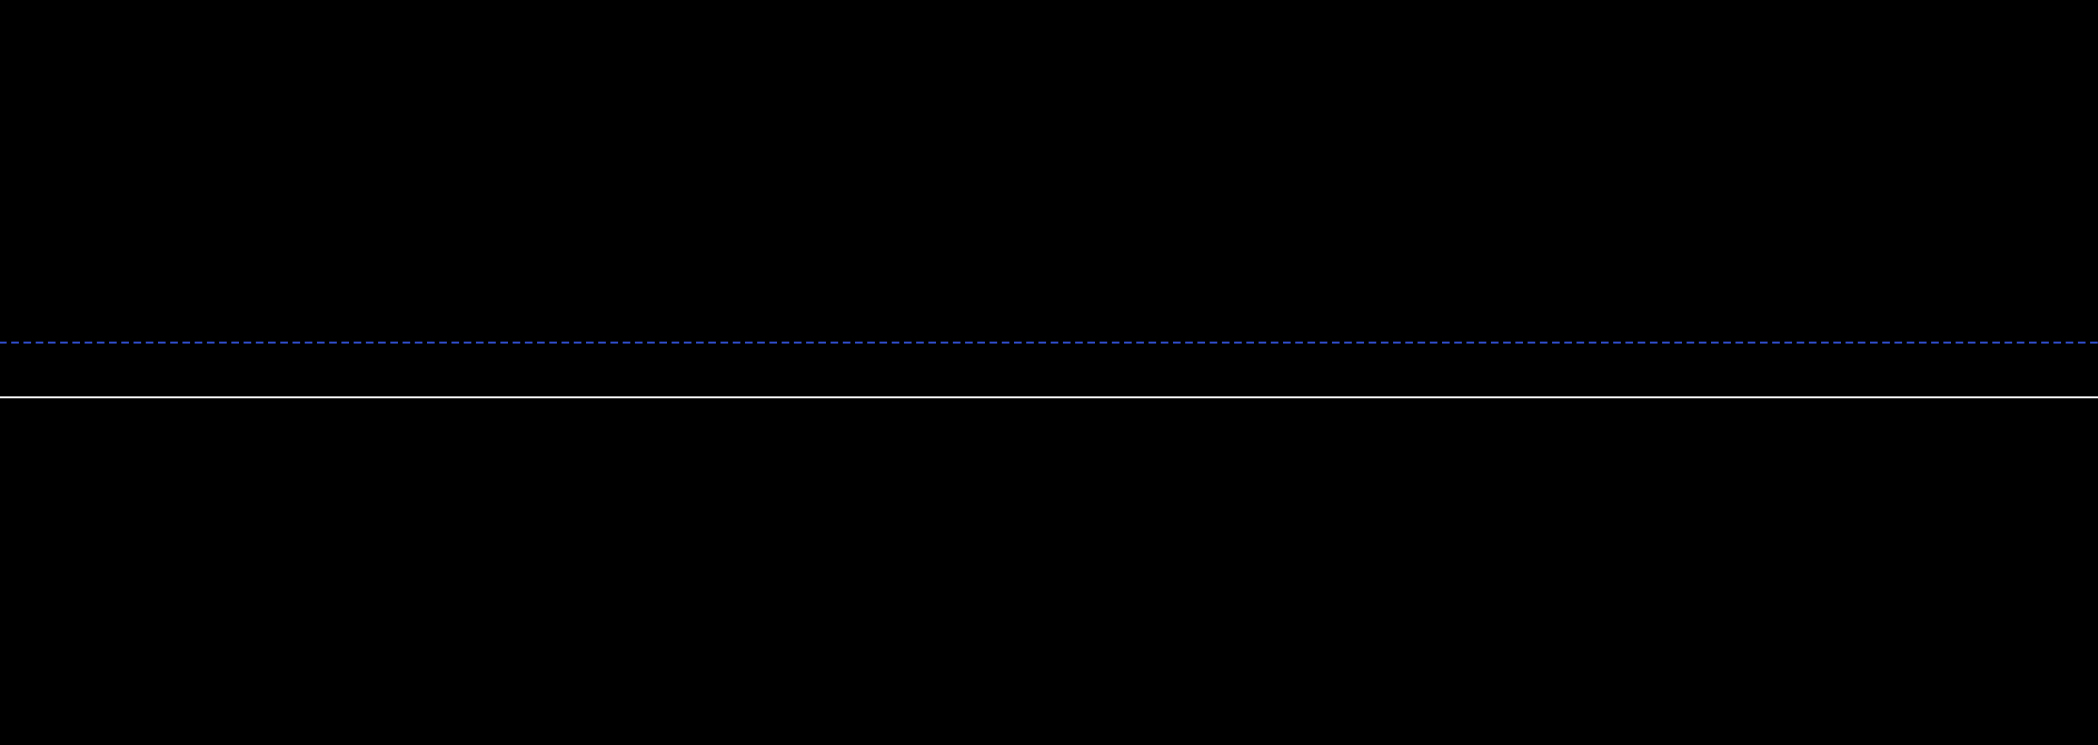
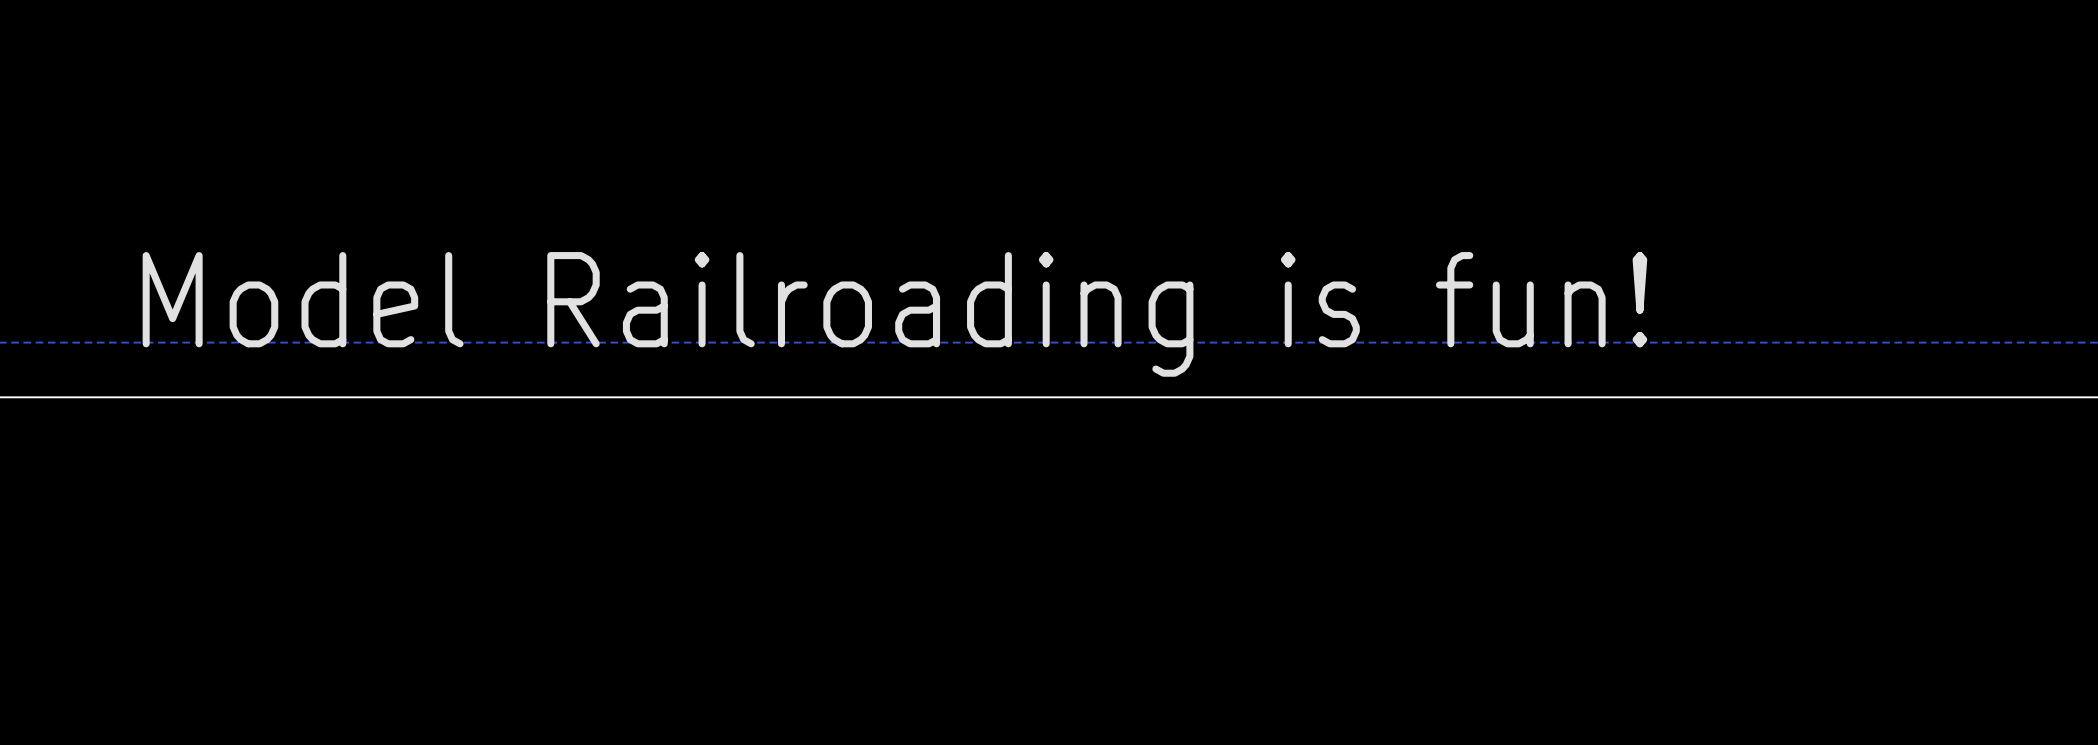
text: none -> Model Railroading is fun! (894, 314)

